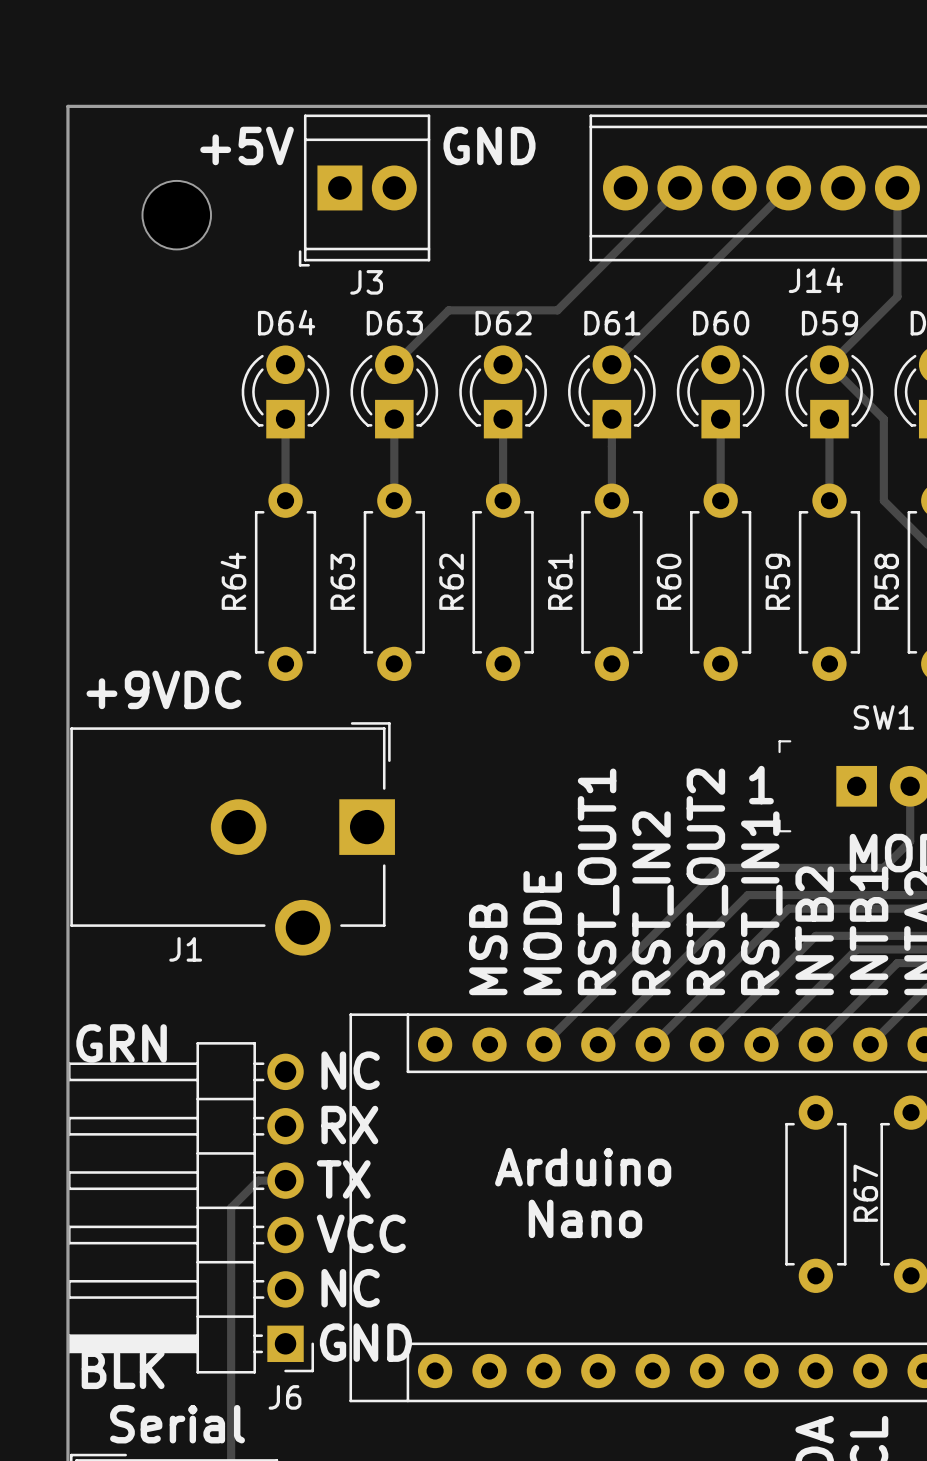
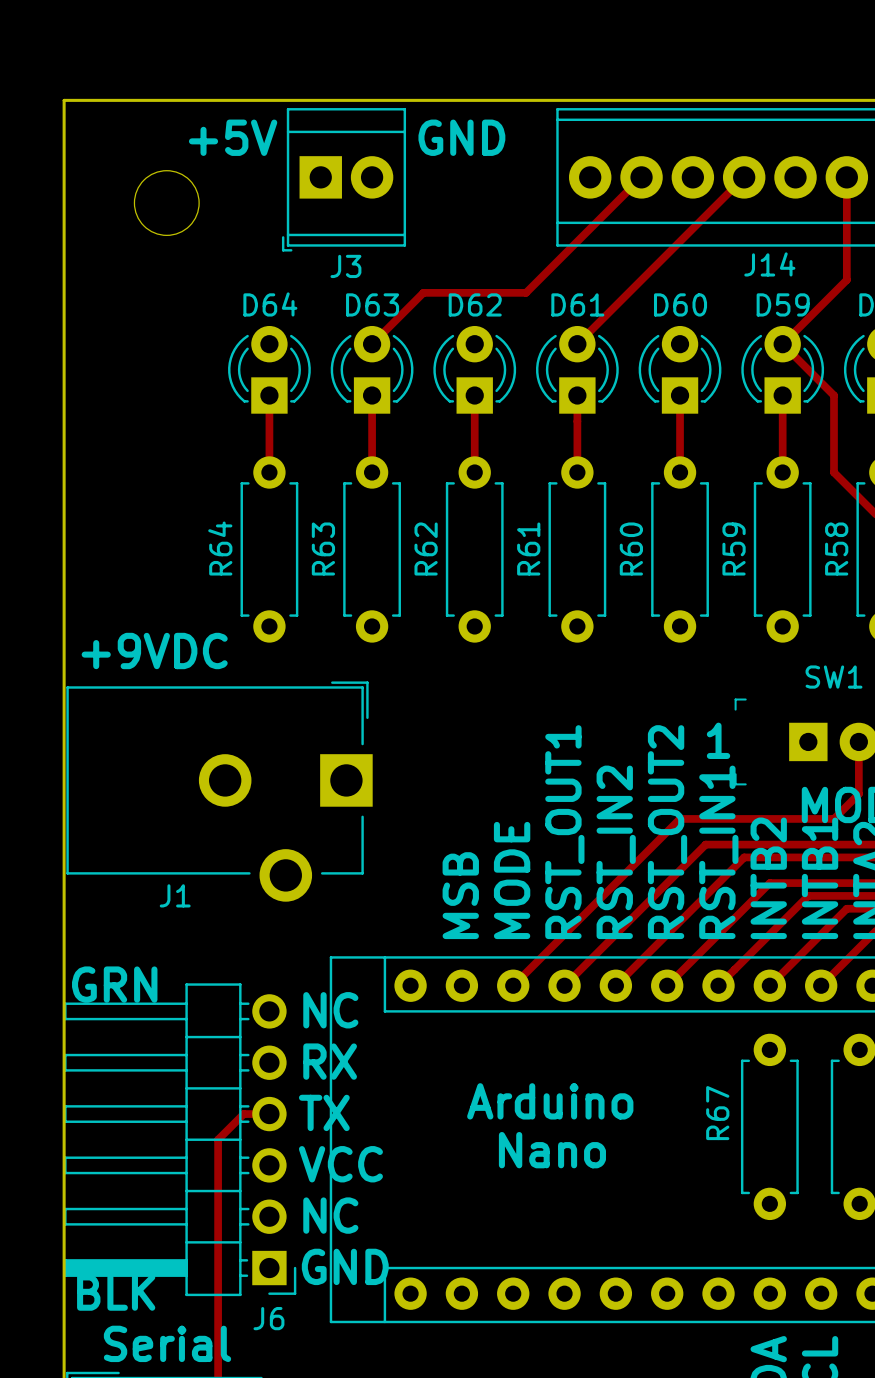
R67 name position: R67 (865, 1193) -> R67 (717, 1113)

